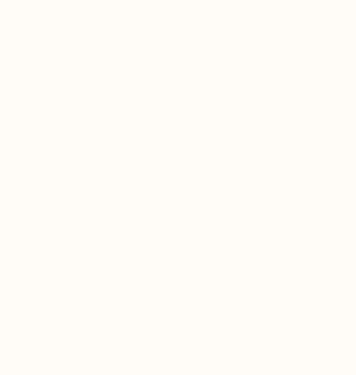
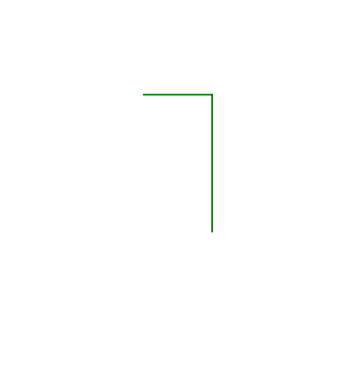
wire: none -> (143, 94) (212, 94) (212, 231)

